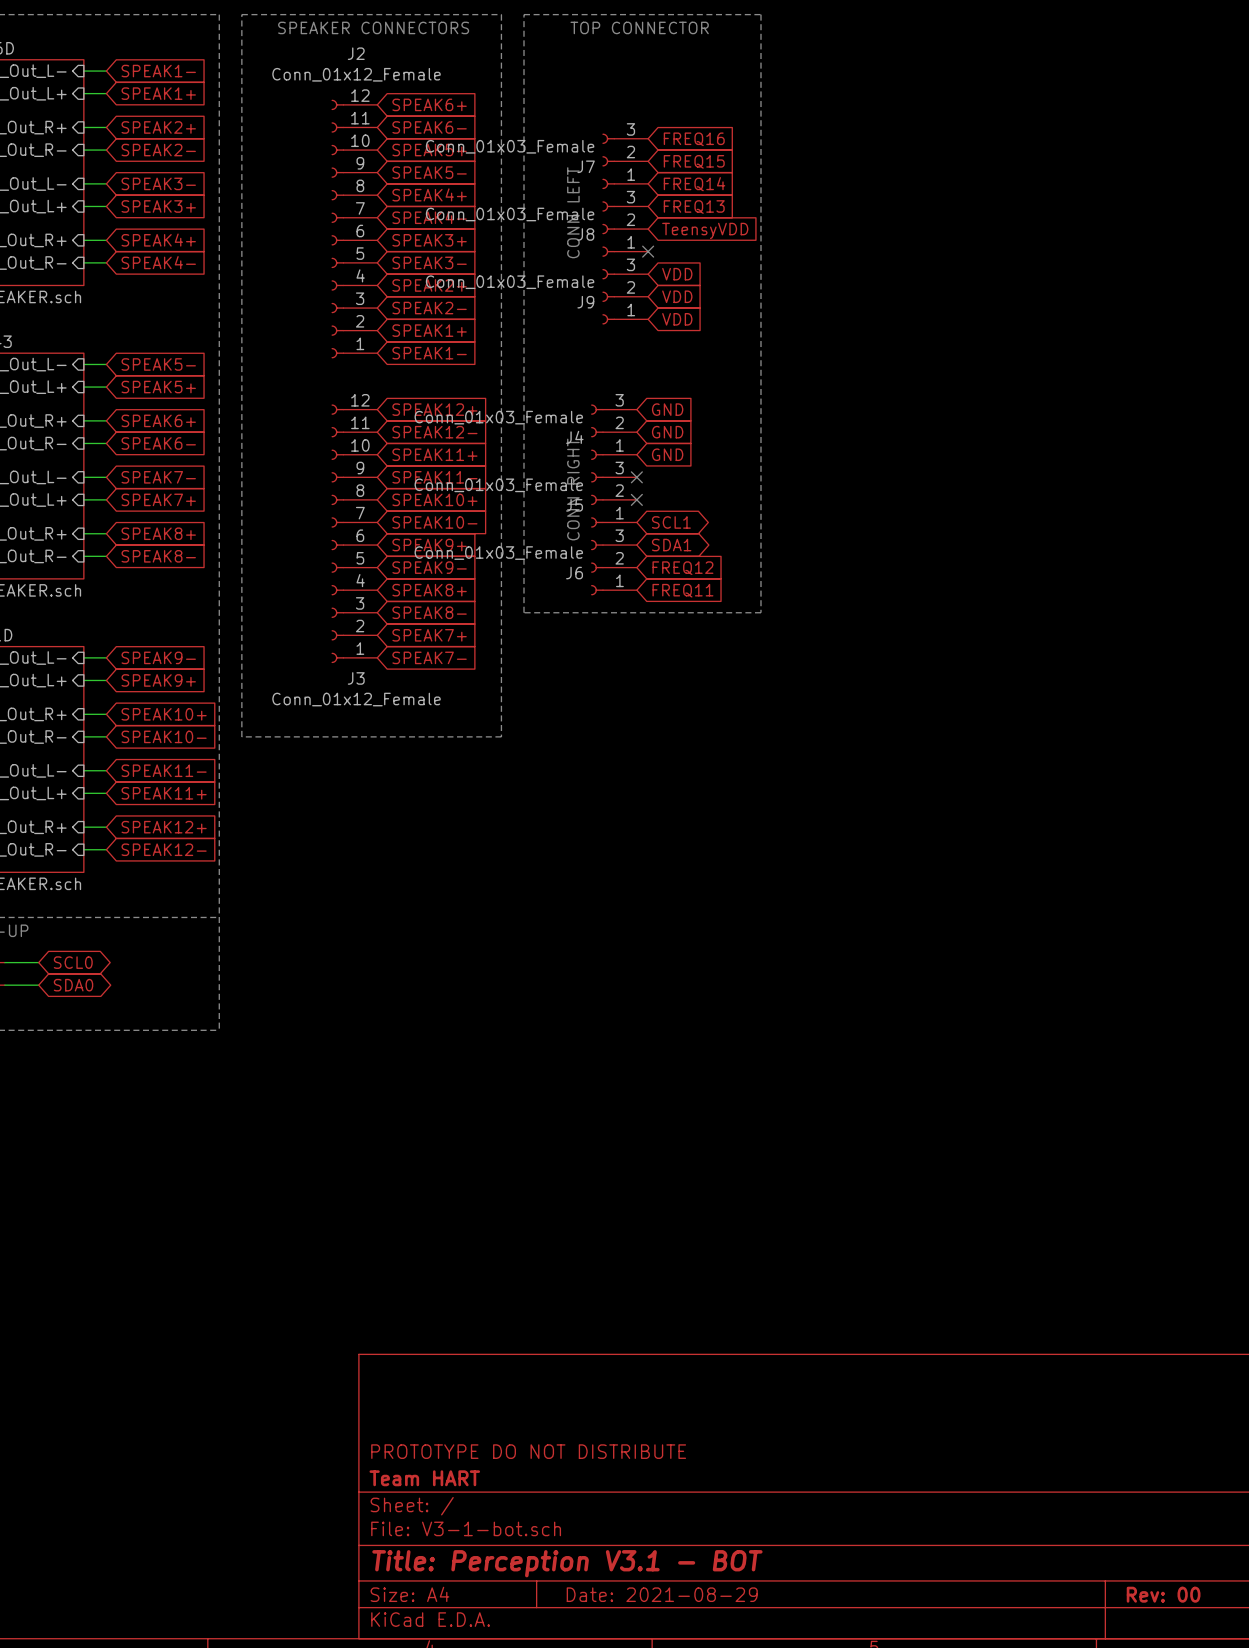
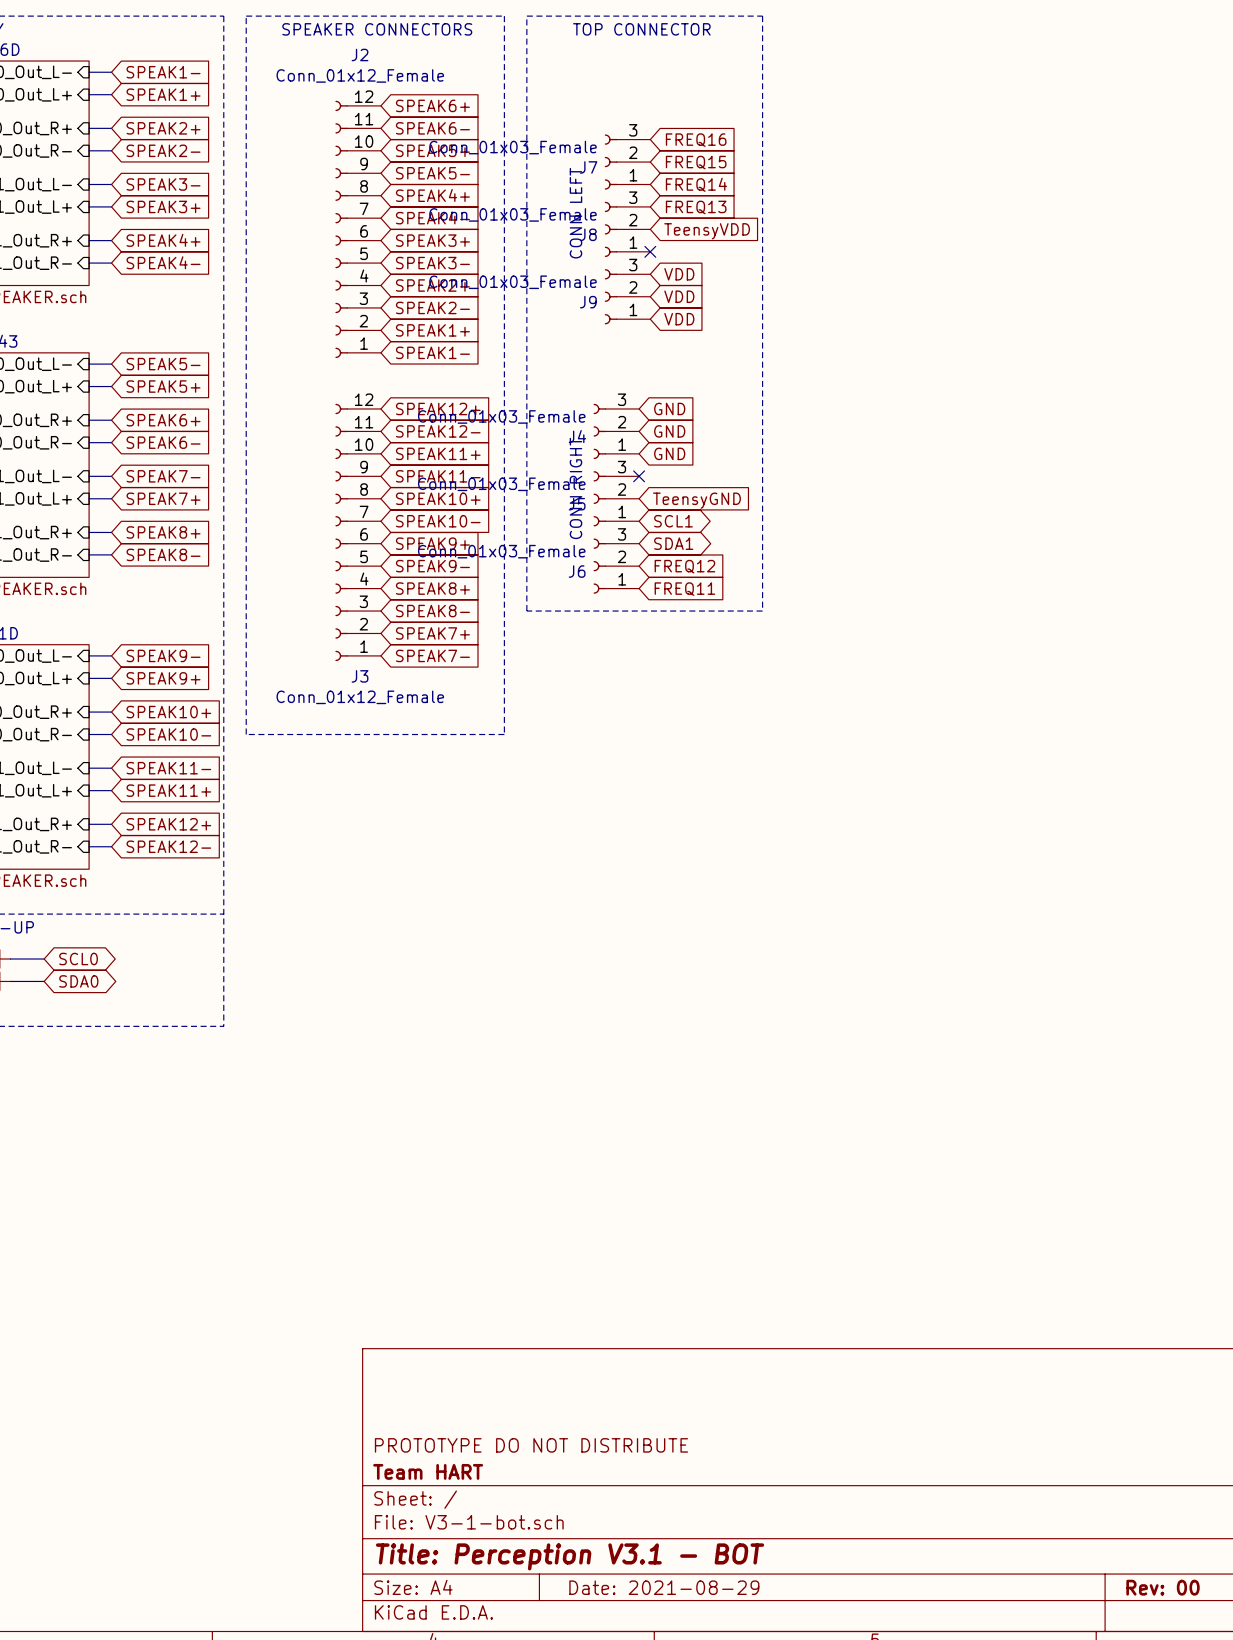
no-connect mark: (636, 499) -> none
global label: none -> TeensyGND (696, 500)

